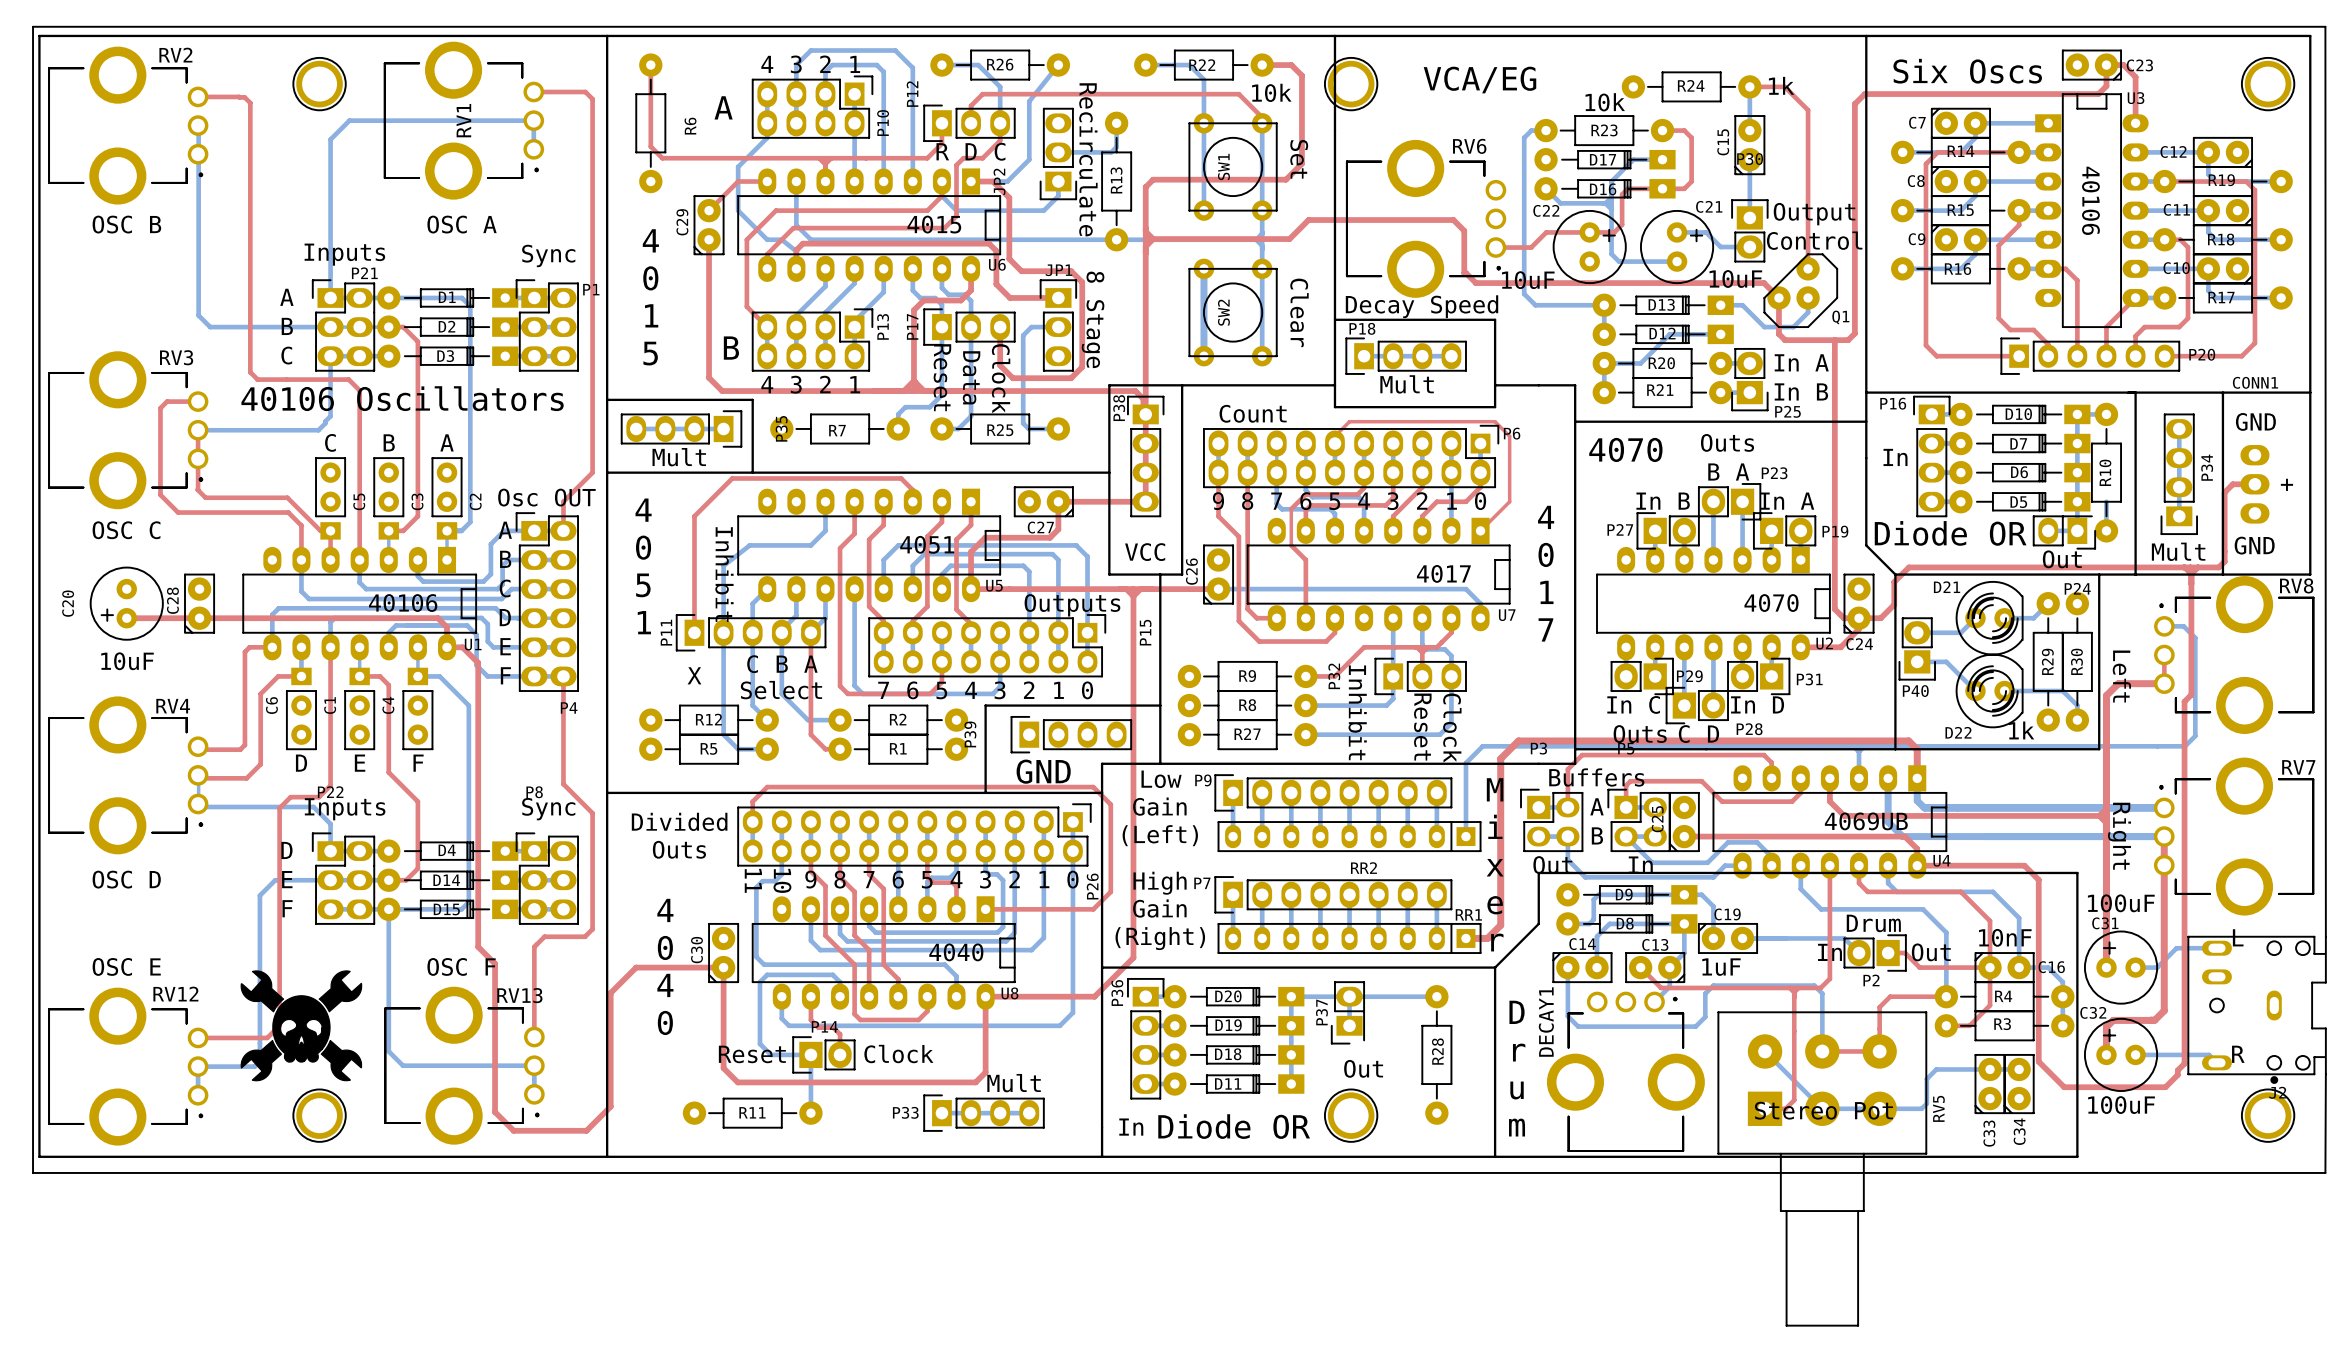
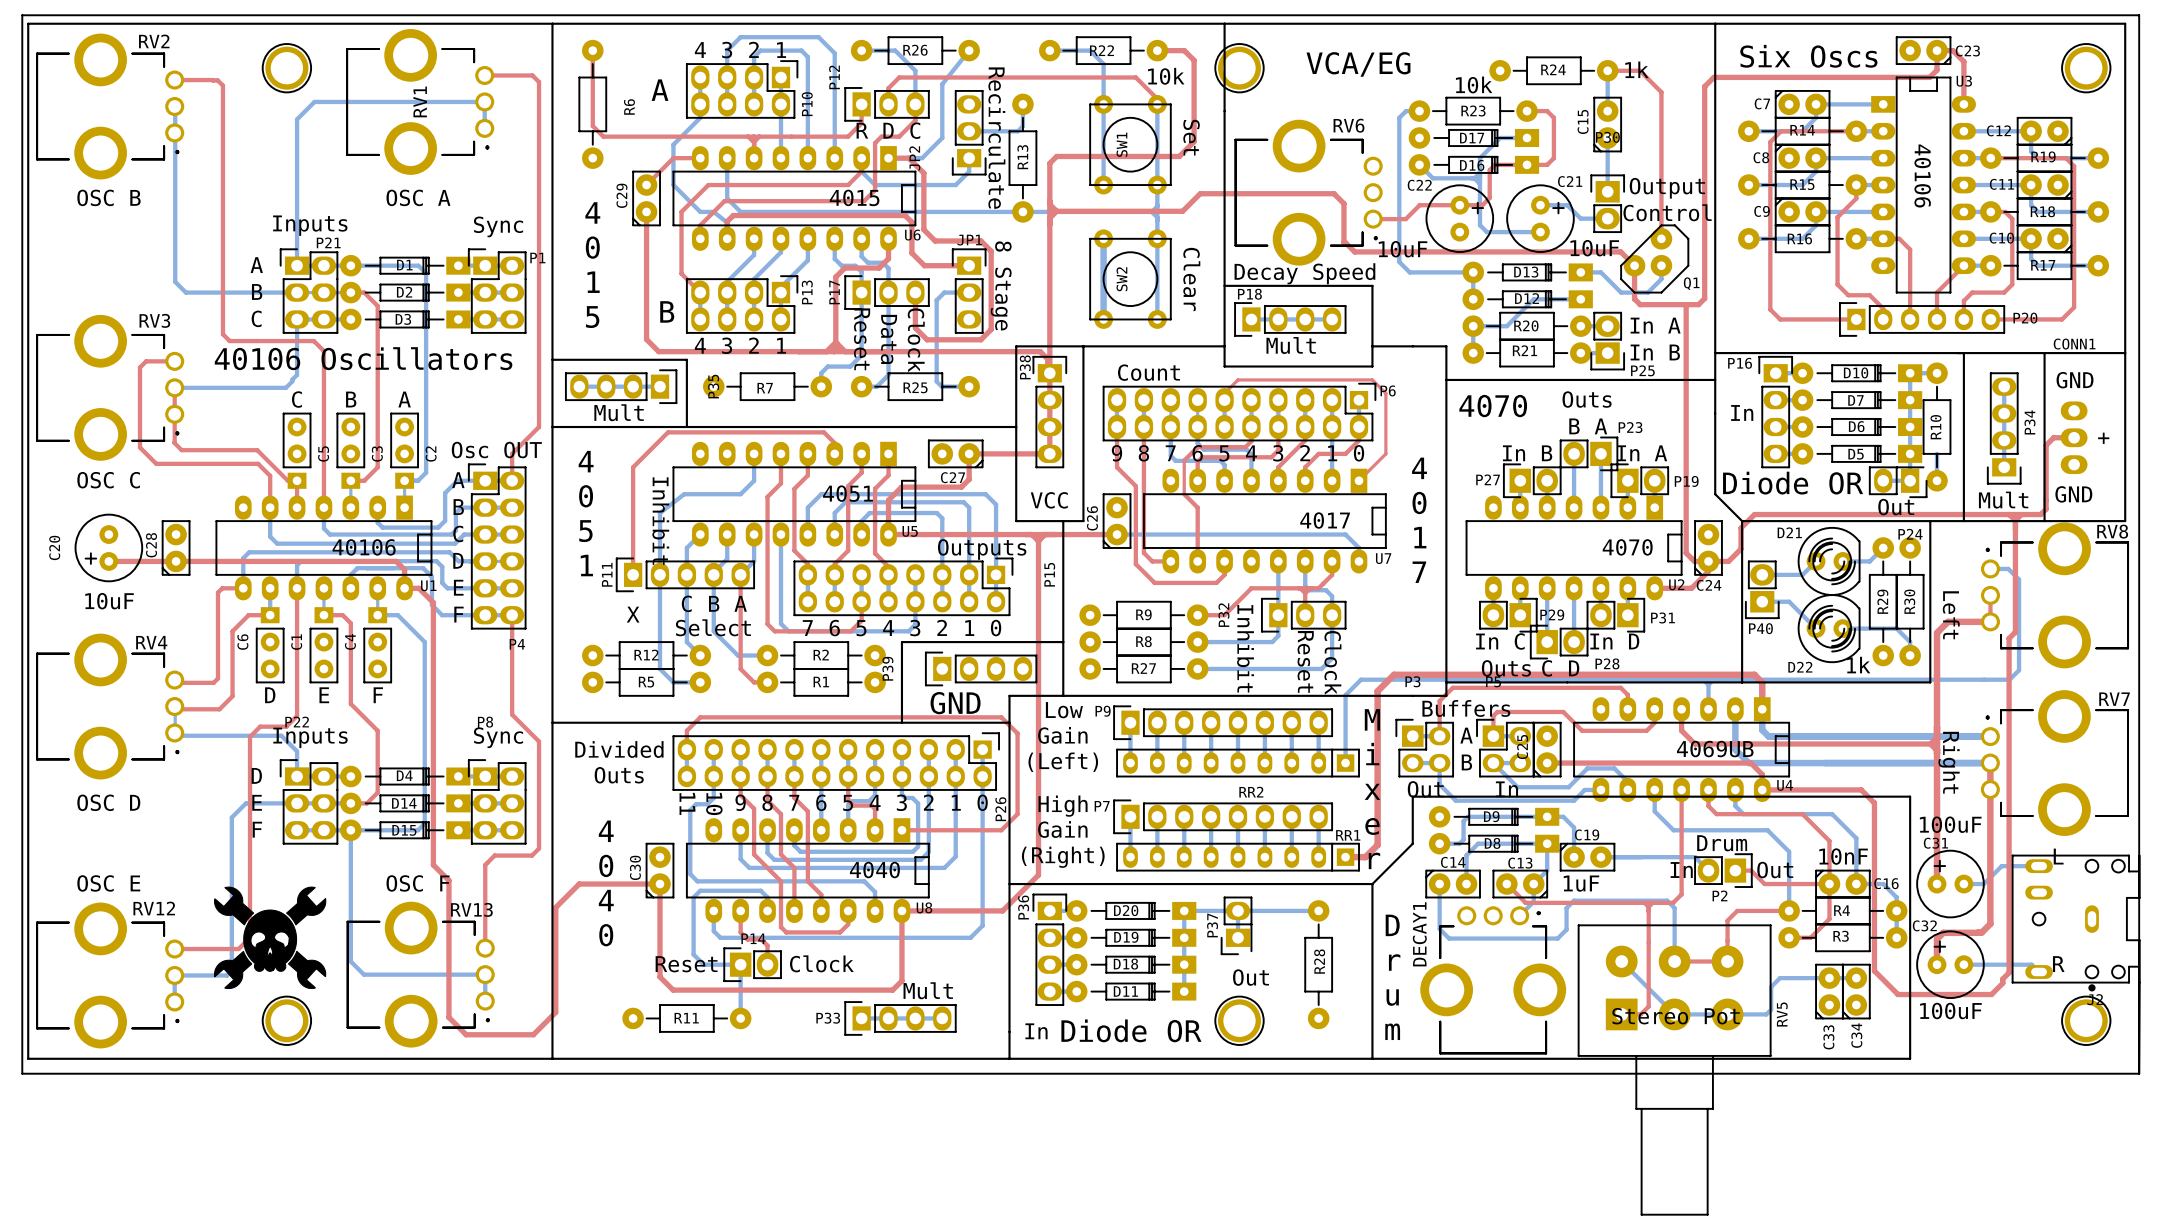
board edge: (2325, 26) (2325, 936) -> (2139, 15) (2139, 1073)

